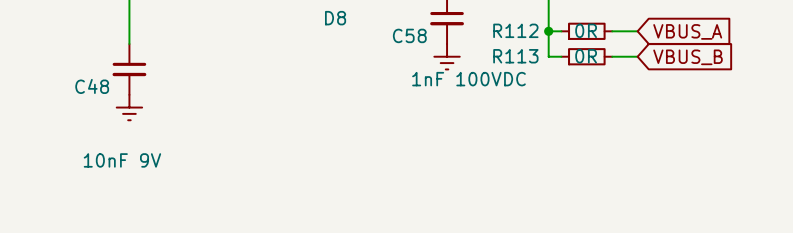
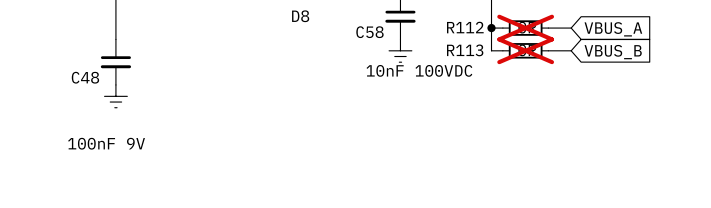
R112 do-not-place cross: none -> (525, 28)
R113 do-not-place cross: none -> (525, 50)
C58 value: 1nF 100VDC (468, 79) -> 10nF 100VDC (419, 70)
C48 value: 10nF 9V (122, 160) -> 100nF 9V (106, 143)

